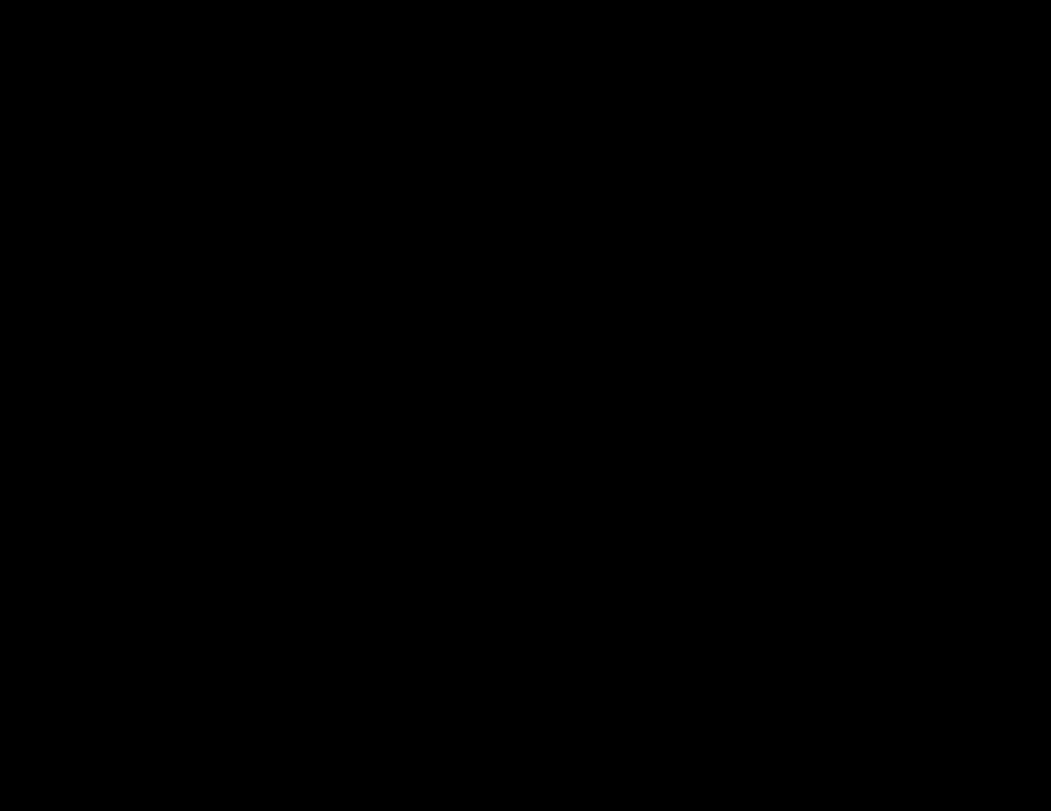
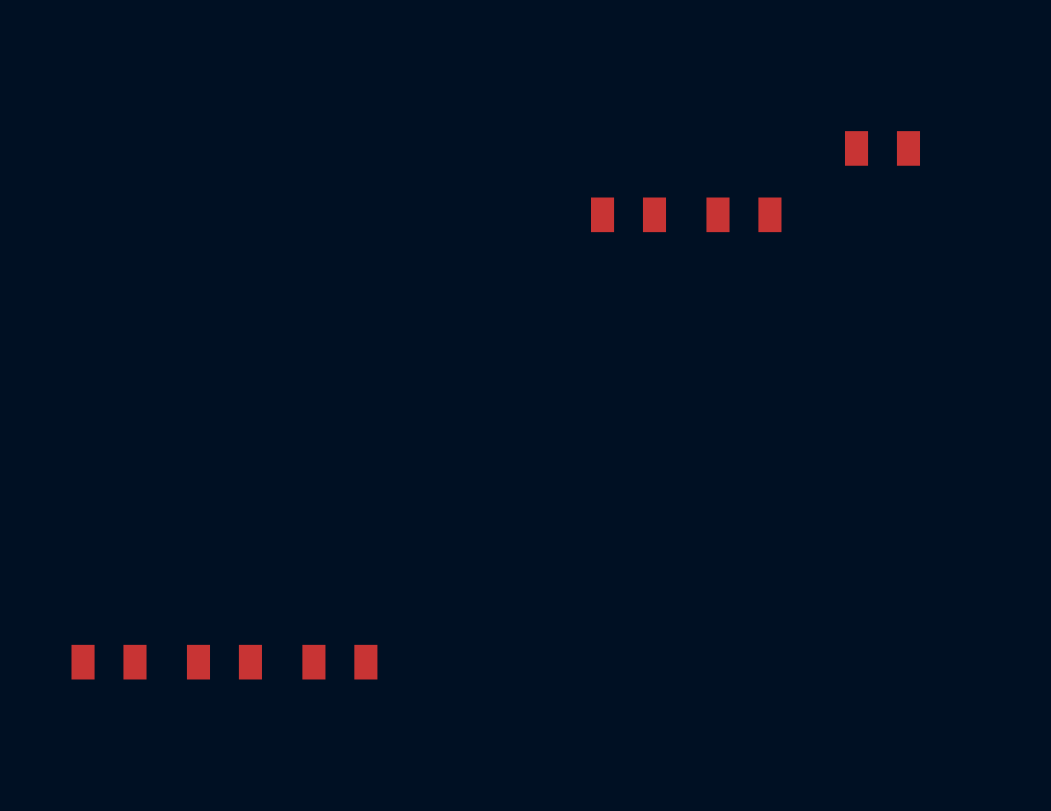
part: none -> (882, 148)
part: none -> (628, 214)
part: none -> (743, 214)
part: none -> (109, 662)
part: none -> (224, 662)
part: none -> (339, 662)

